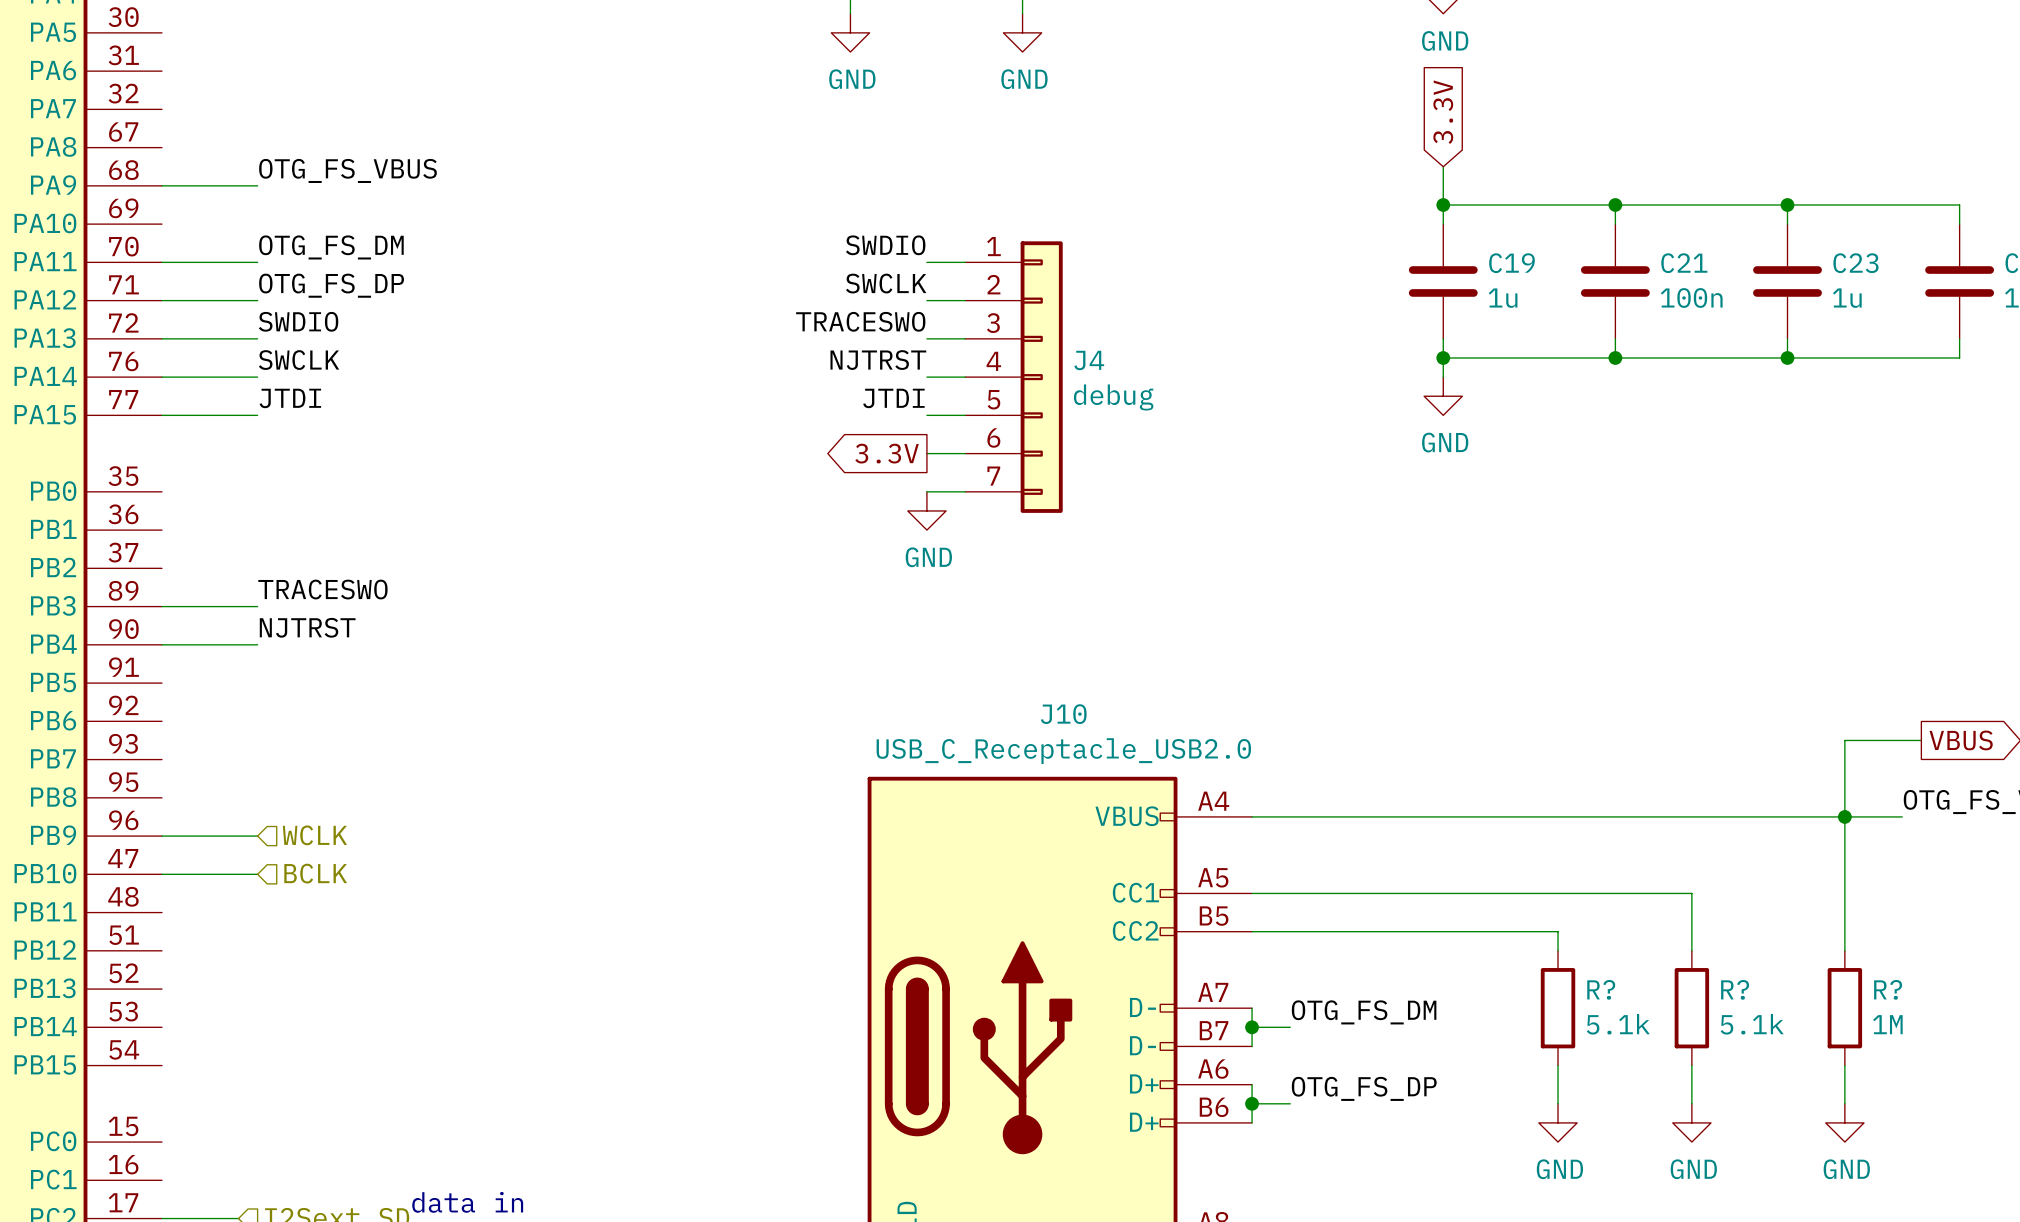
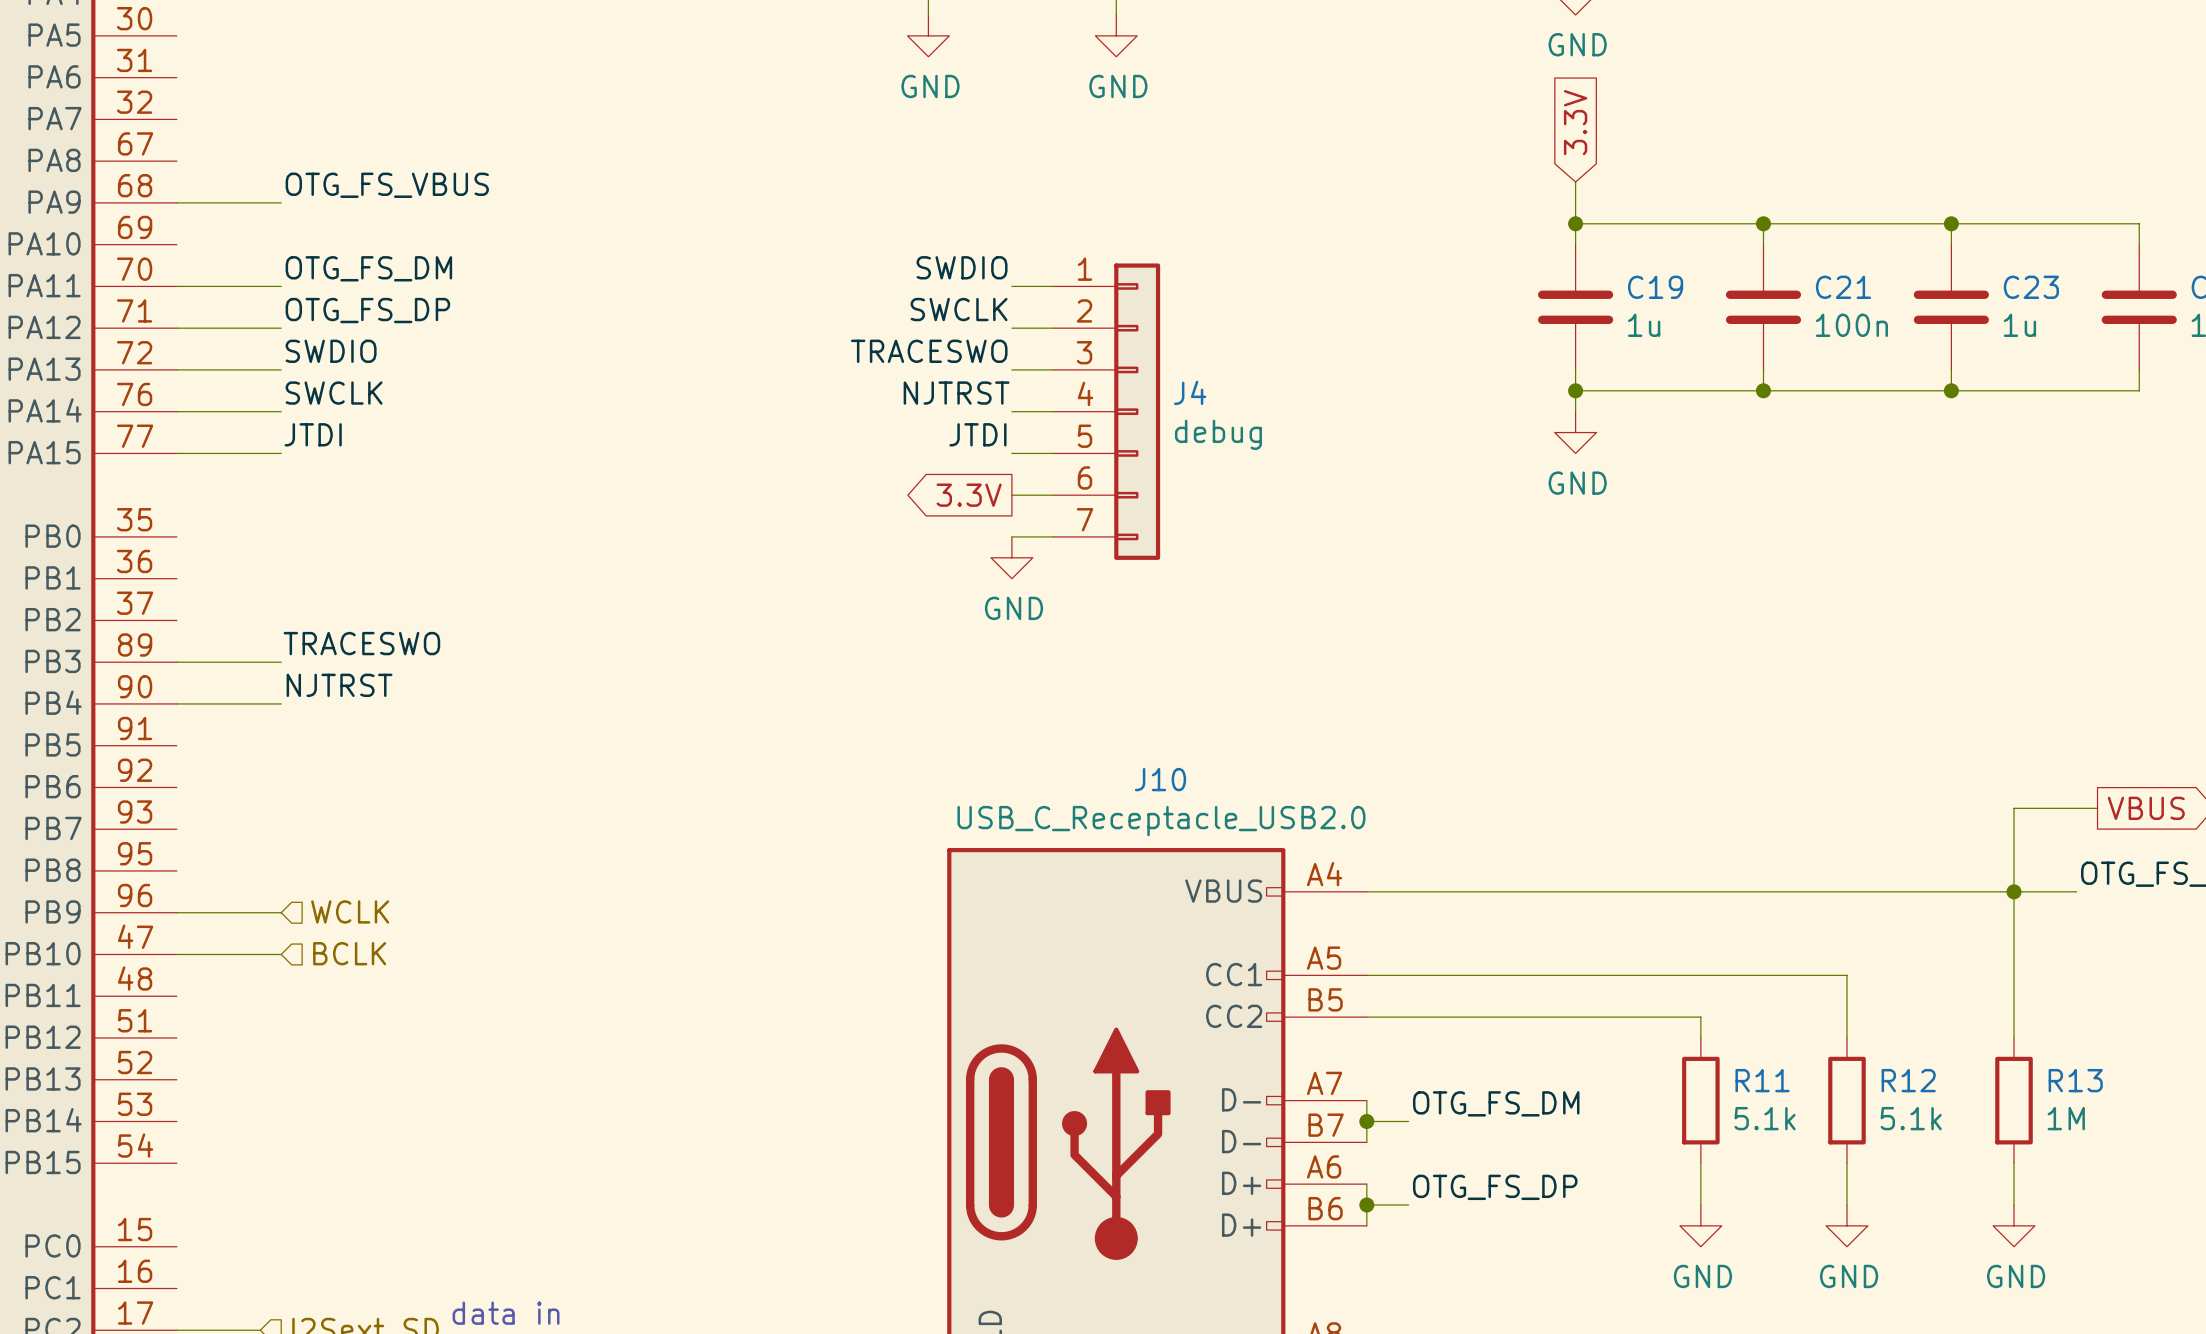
R? name: R? (1601, 989) -> R11 (1762, 1080)
R? name: R? (1735, 989) -> R12 (1908, 1080)
R? name: R? (1888, 989) -> R13 (2075, 1080)

